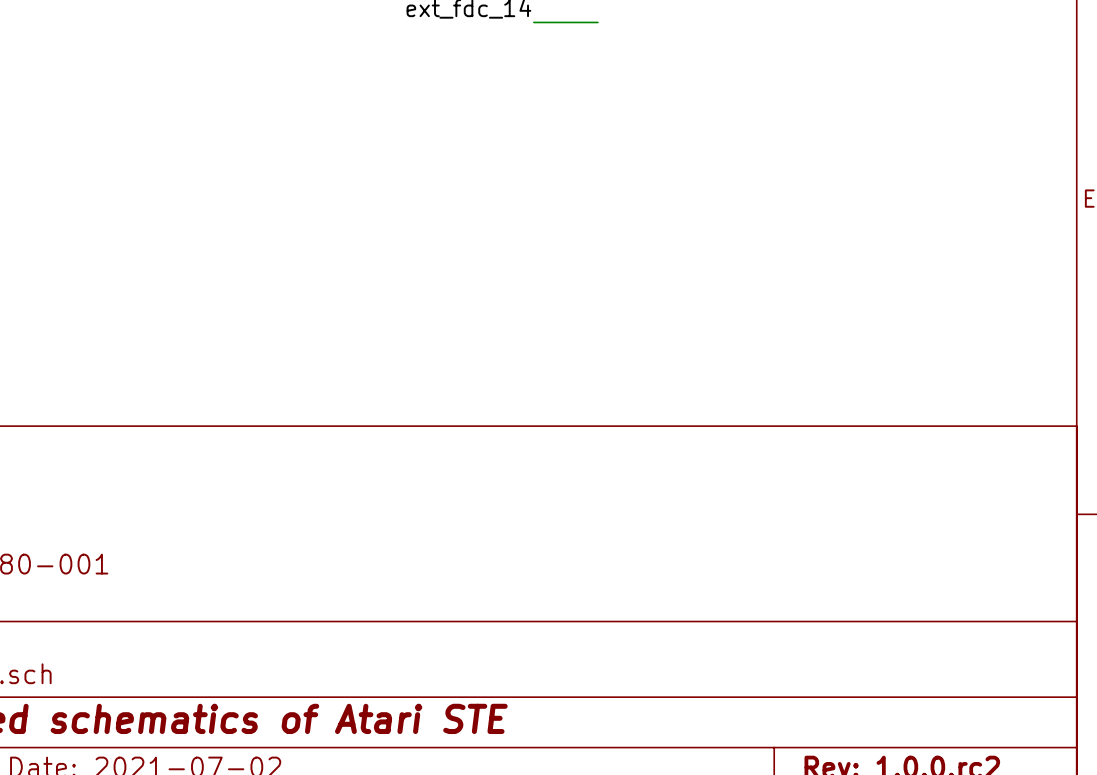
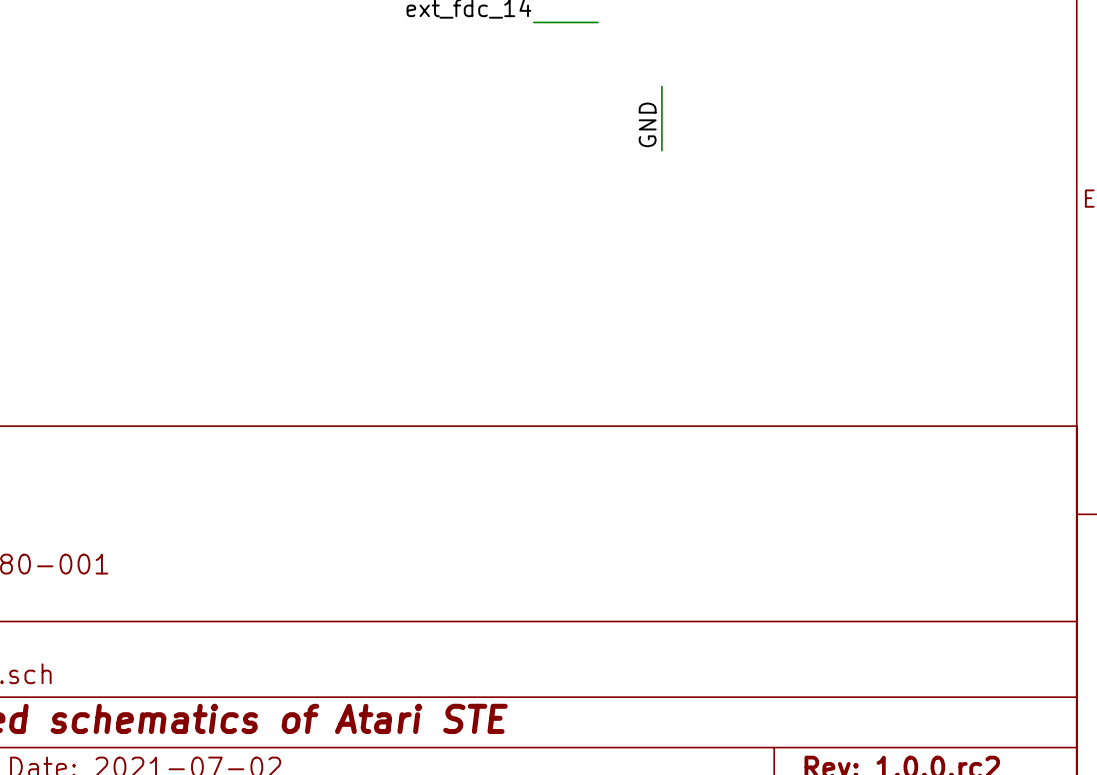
wire: none -> (661, 86) (661, 150)
label: none -> GND (647, 124)

